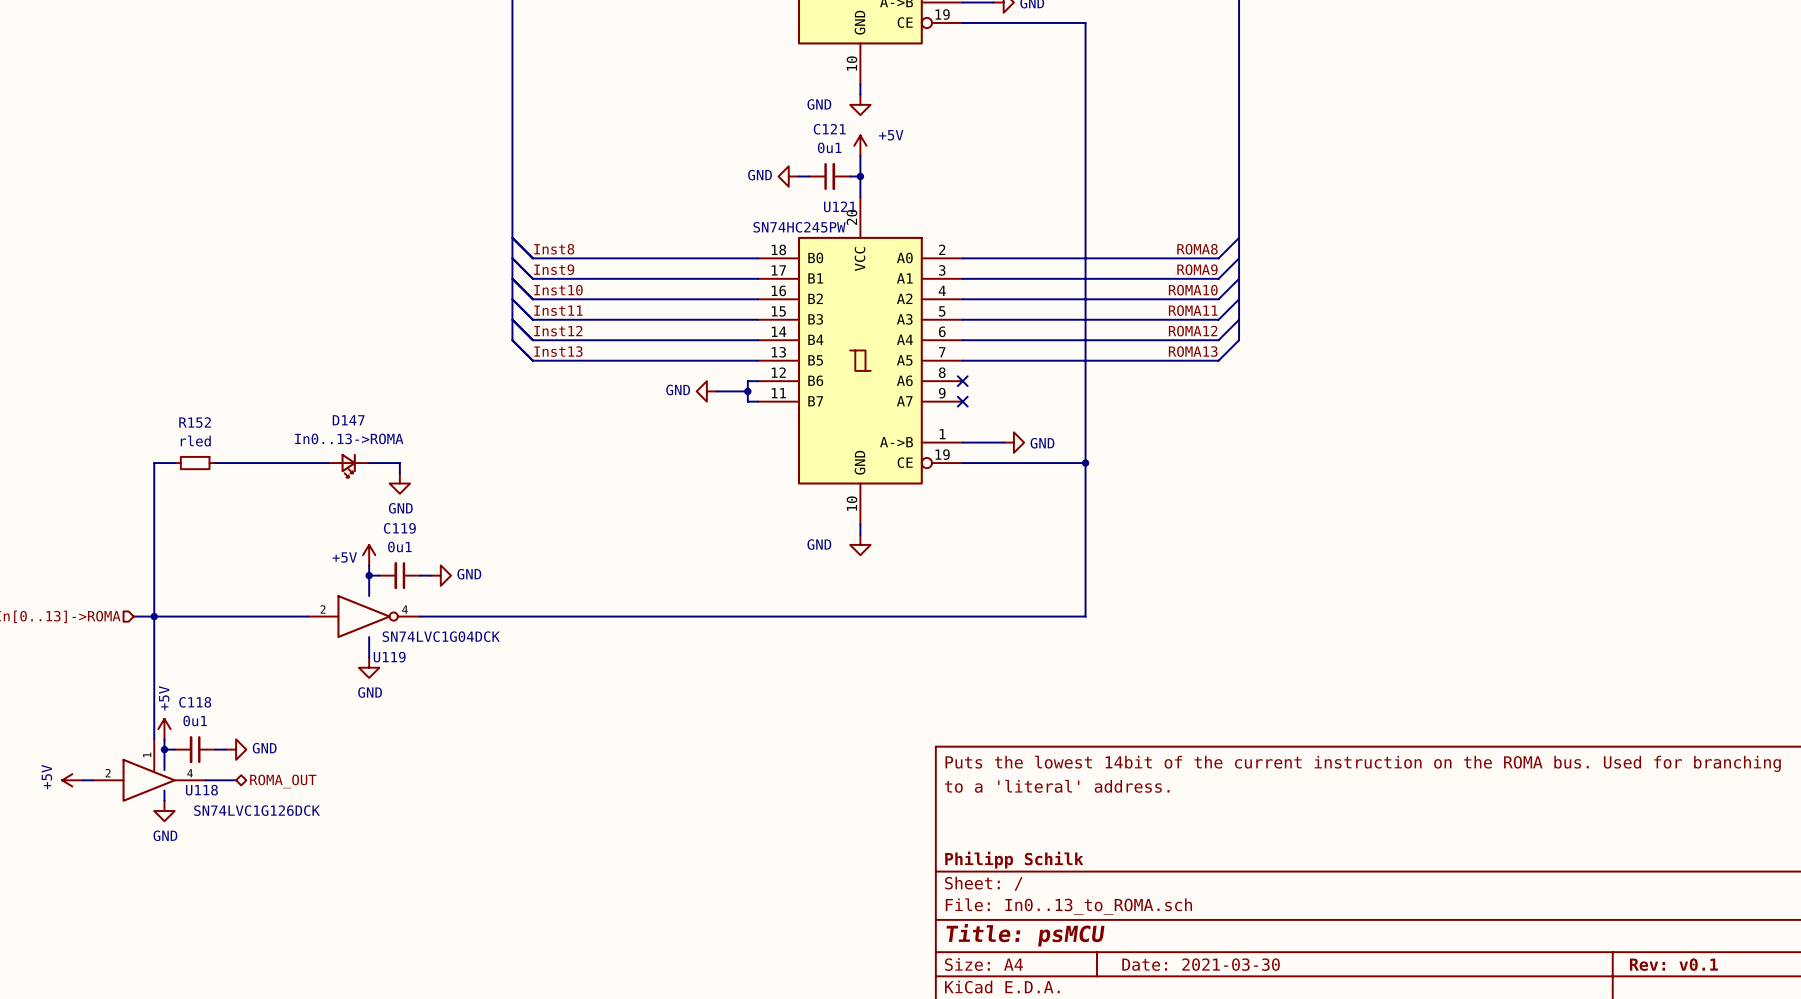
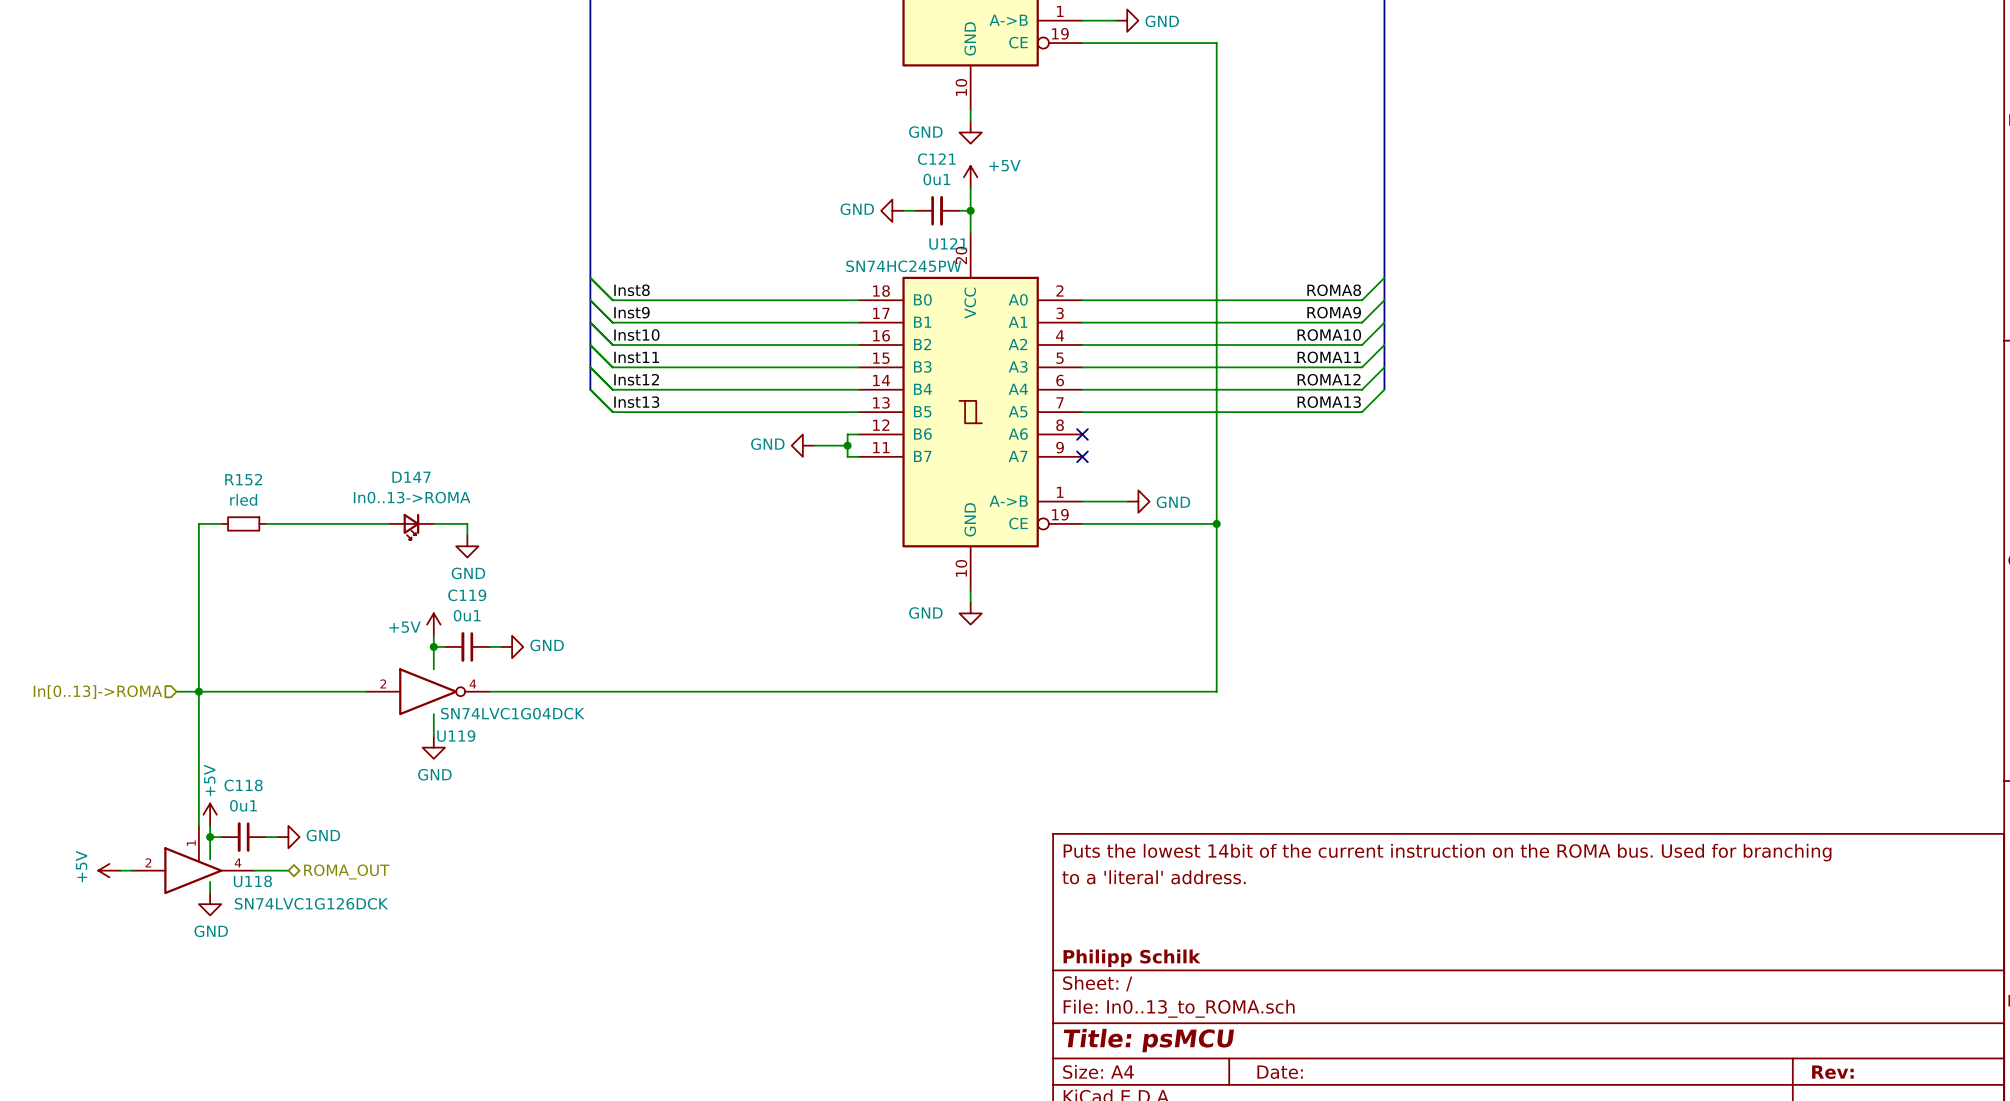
title block: Date: 2021-03-30 (1201, 964) -> Date: (1280, 1072)
title block: Rev: v0.1 (1673, 964) -> Rev: (1832, 1072)

